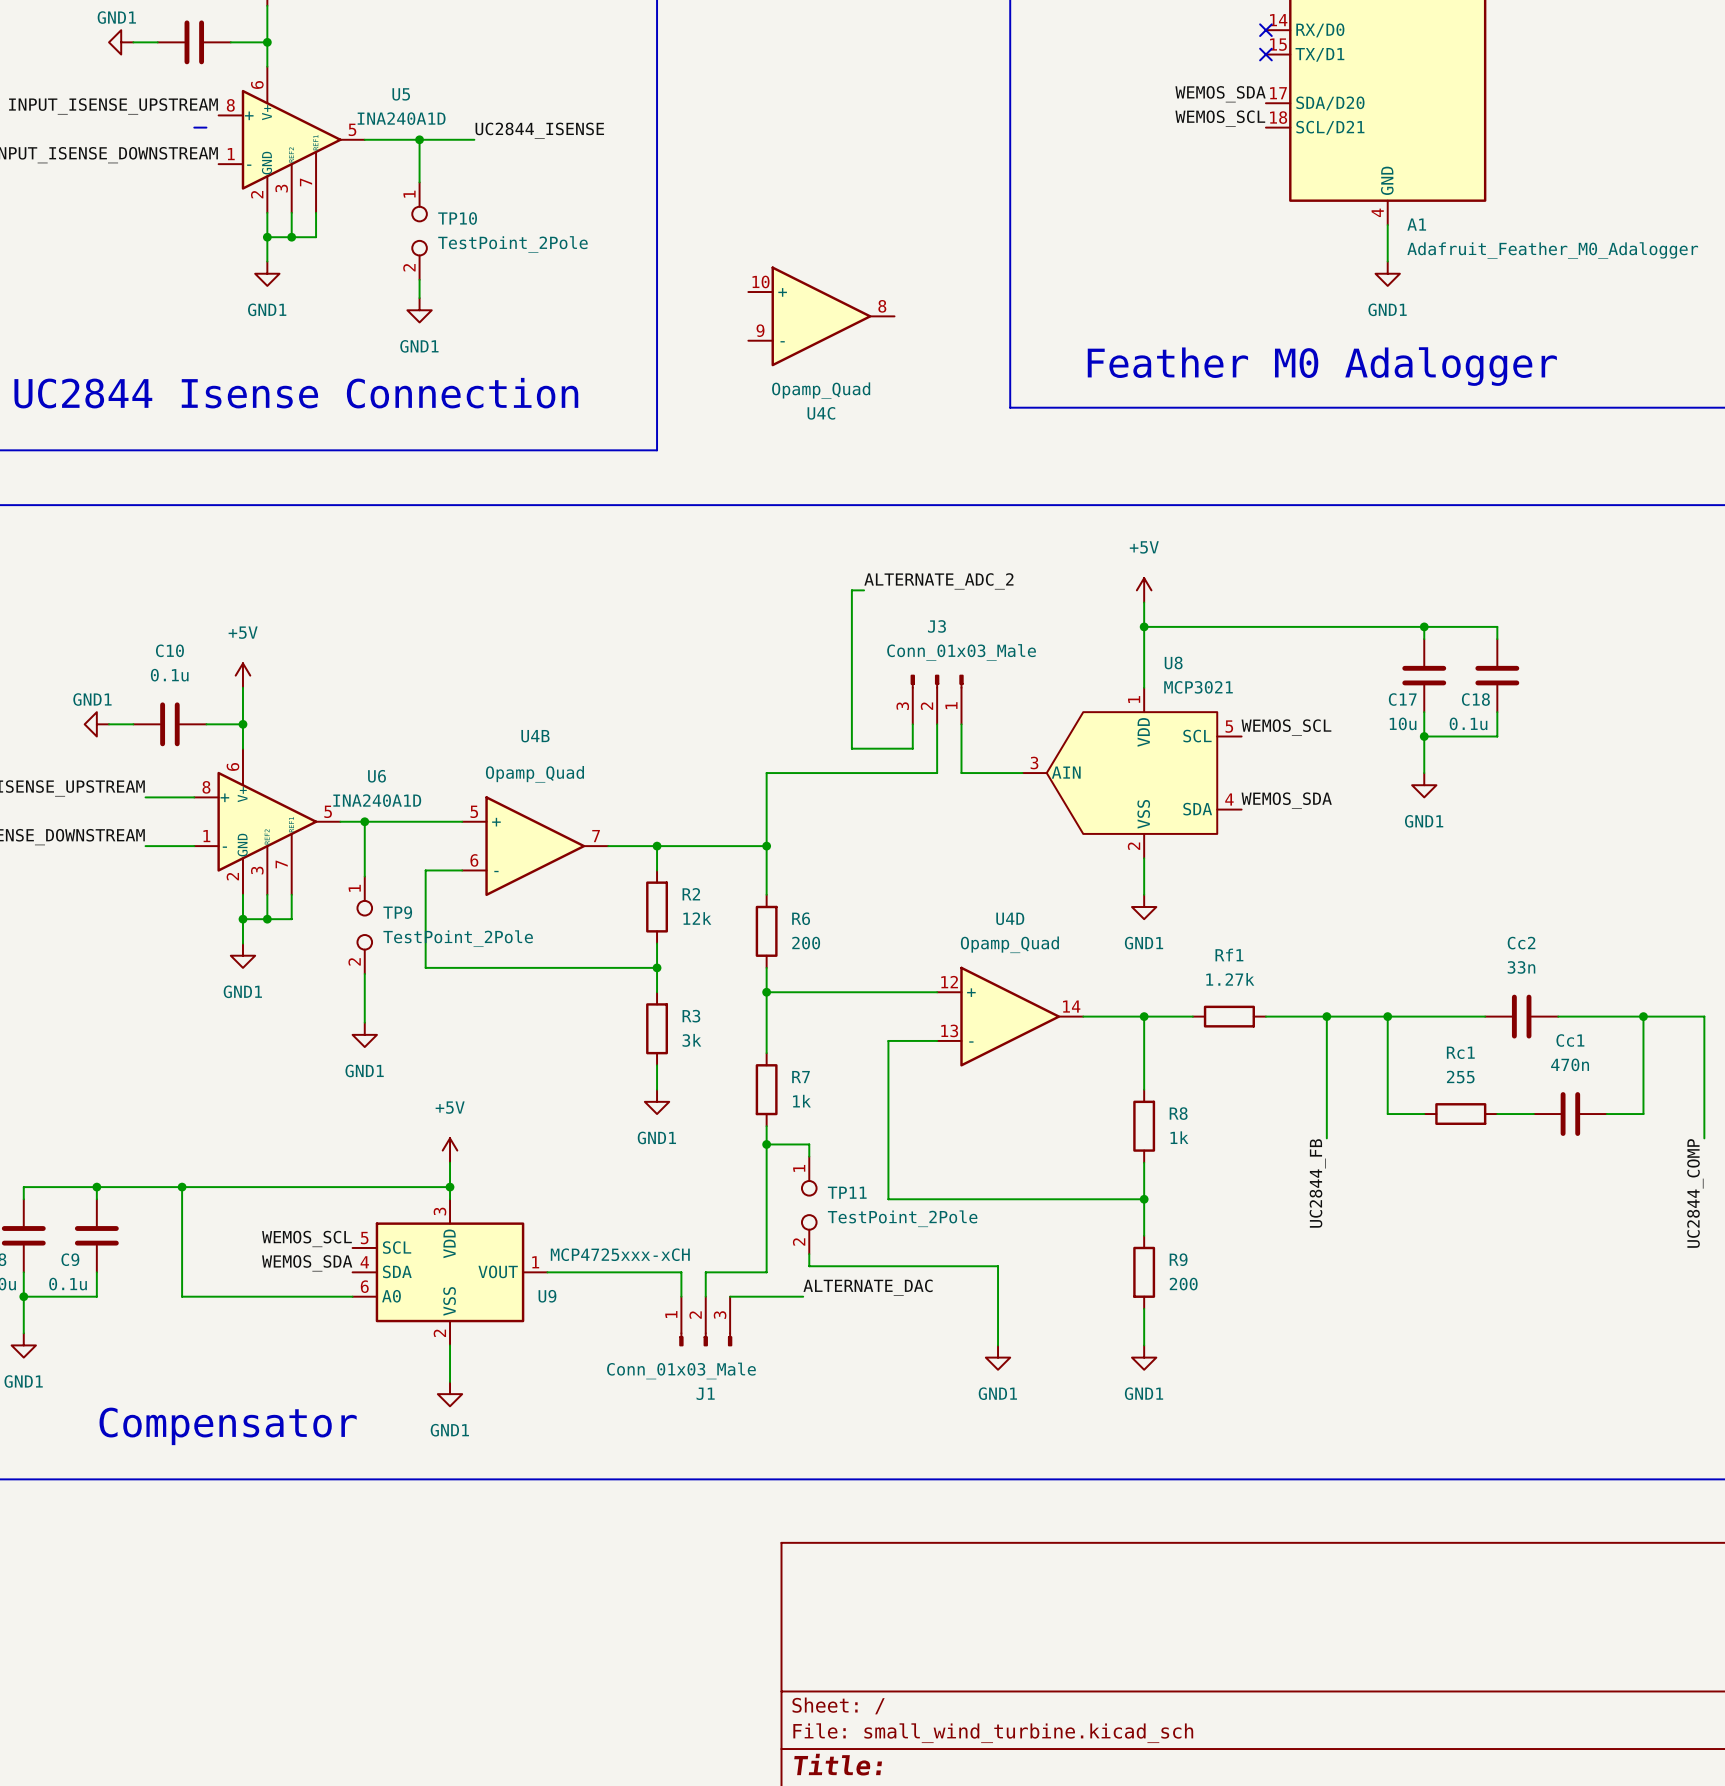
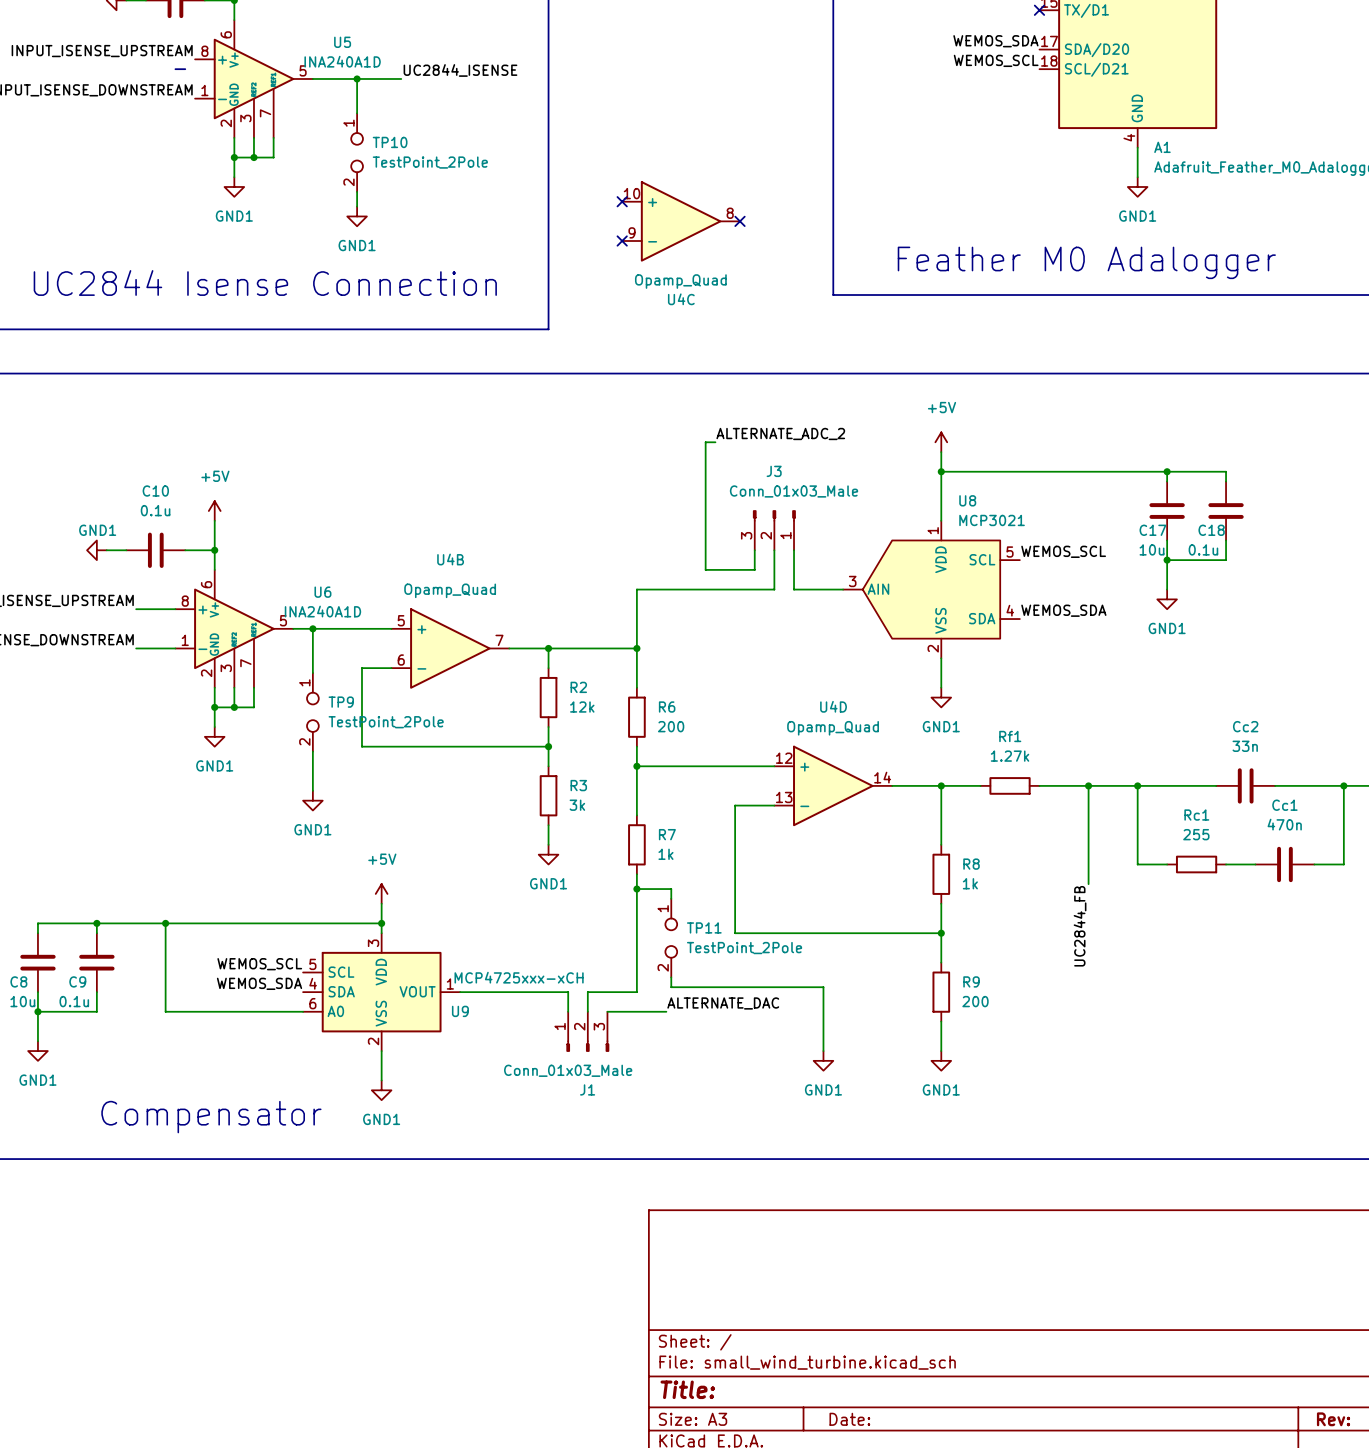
no-connect mark: none -> (622, 201)
no-connect mark: none -> (740, 221)
no-connect mark: none -> (622, 241)

